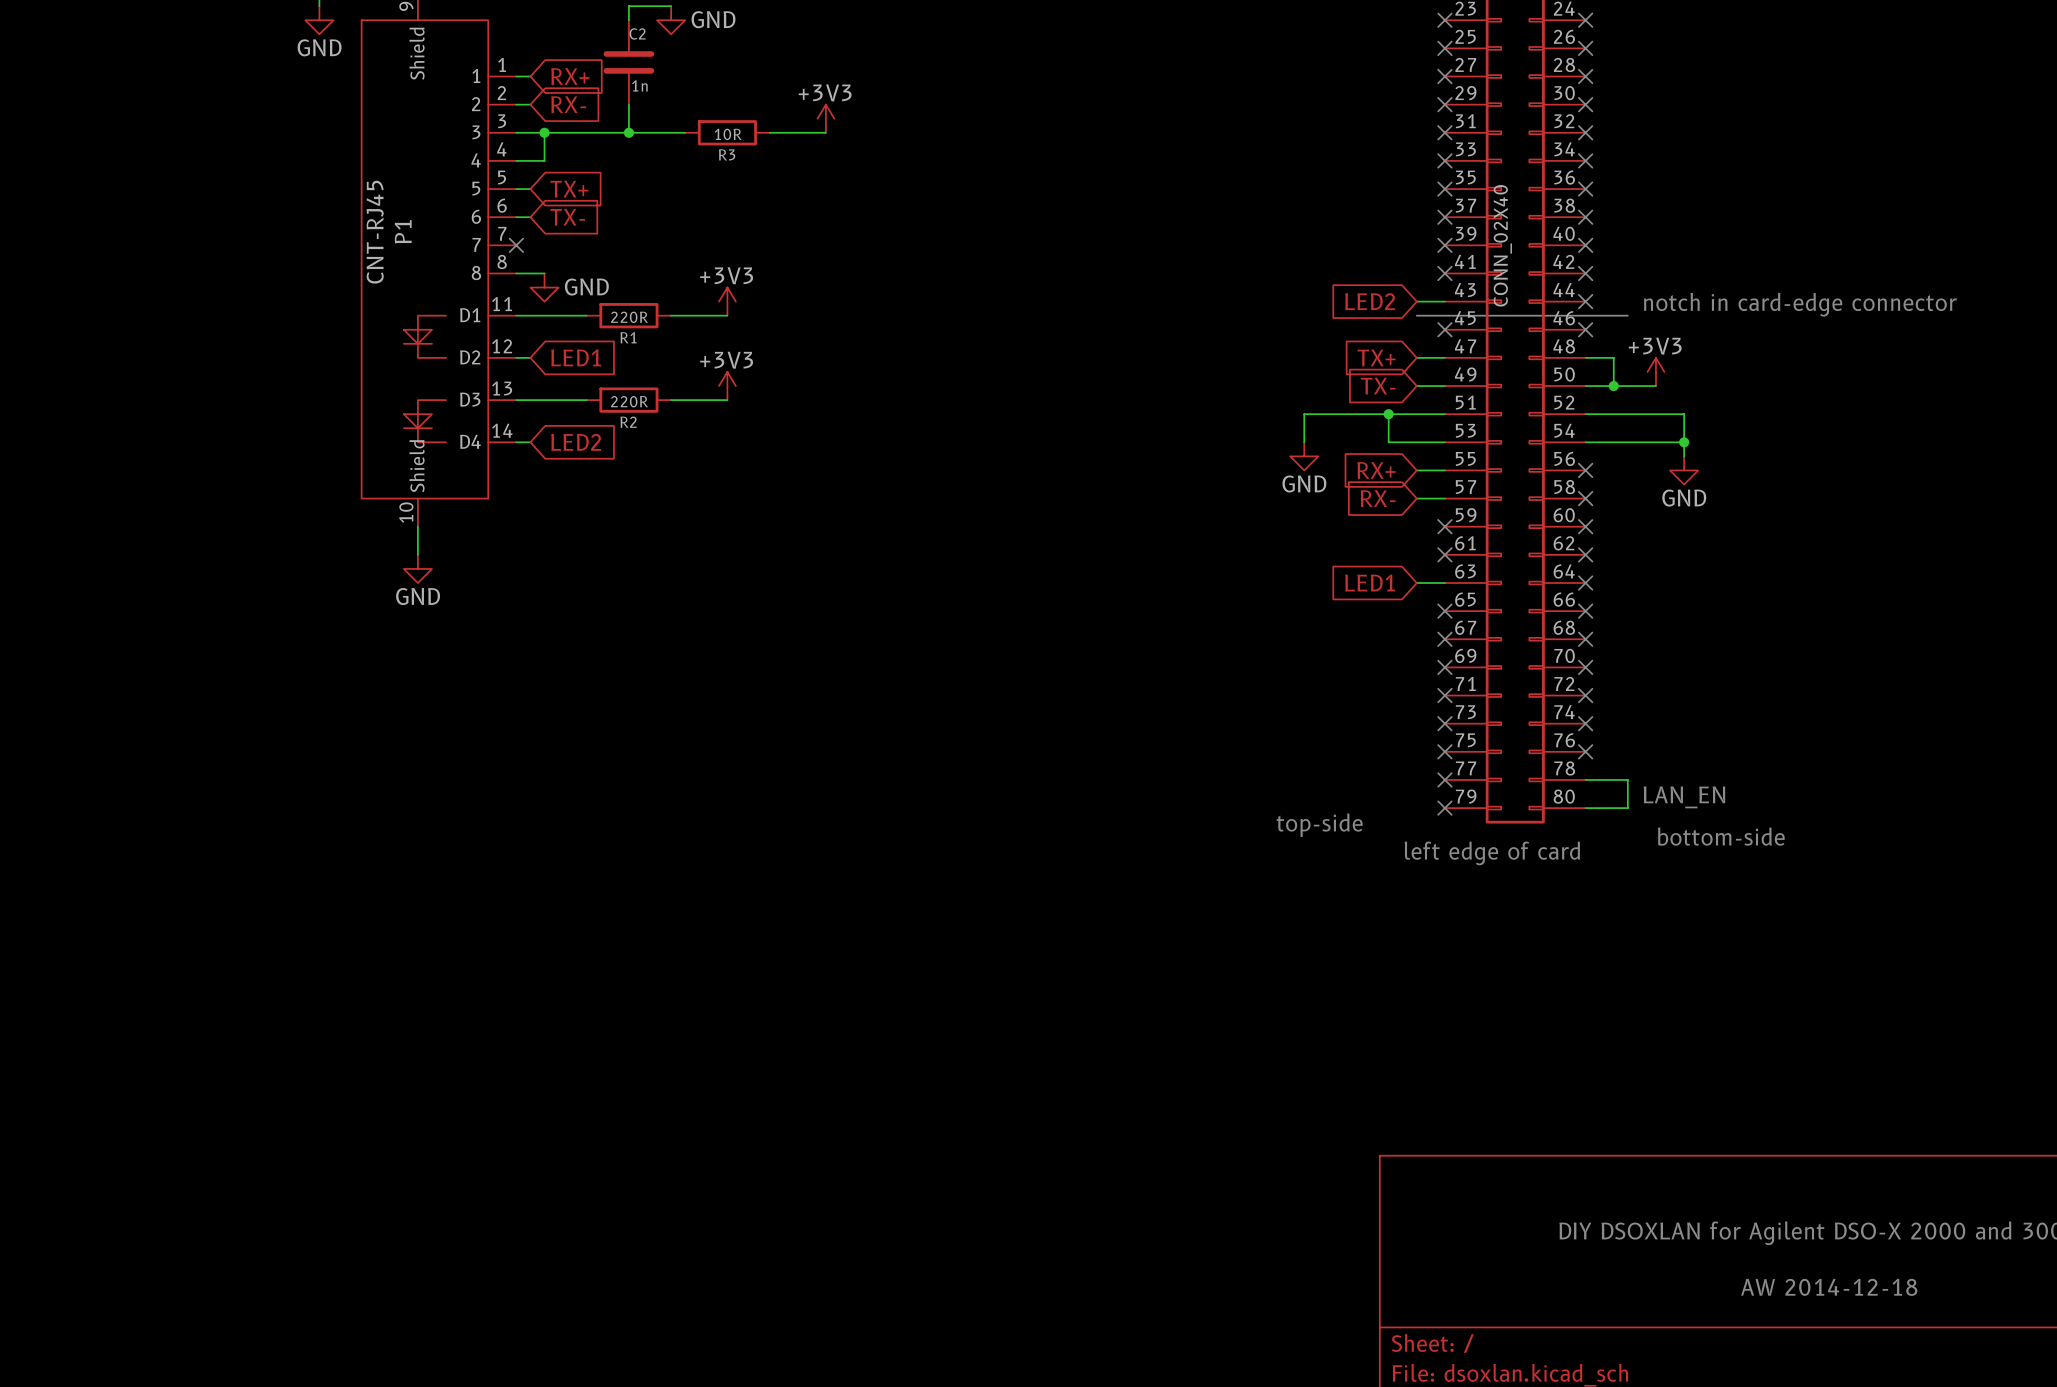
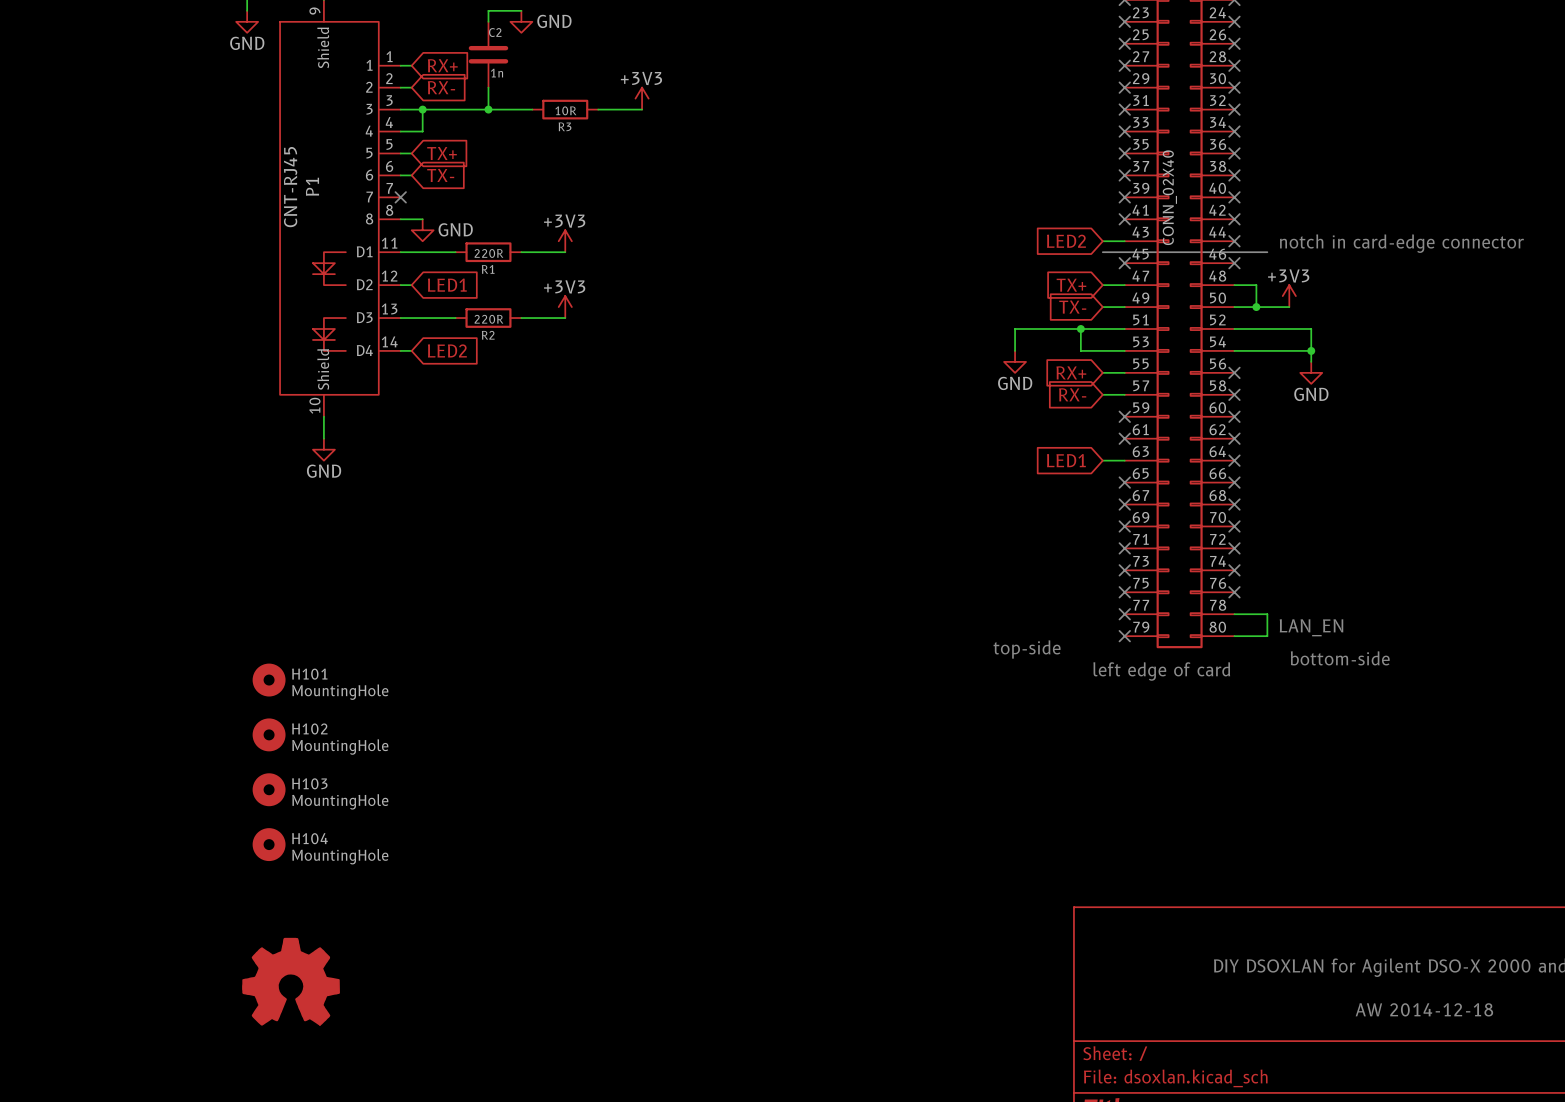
H101: none -> MountingHole (269, 680)
H102: none -> MountingHole (269, 734)
H103: none -> MountingHole (269, 789)
H104: none -> MountingHole (269, 844)
part: none -> (291, 981)

